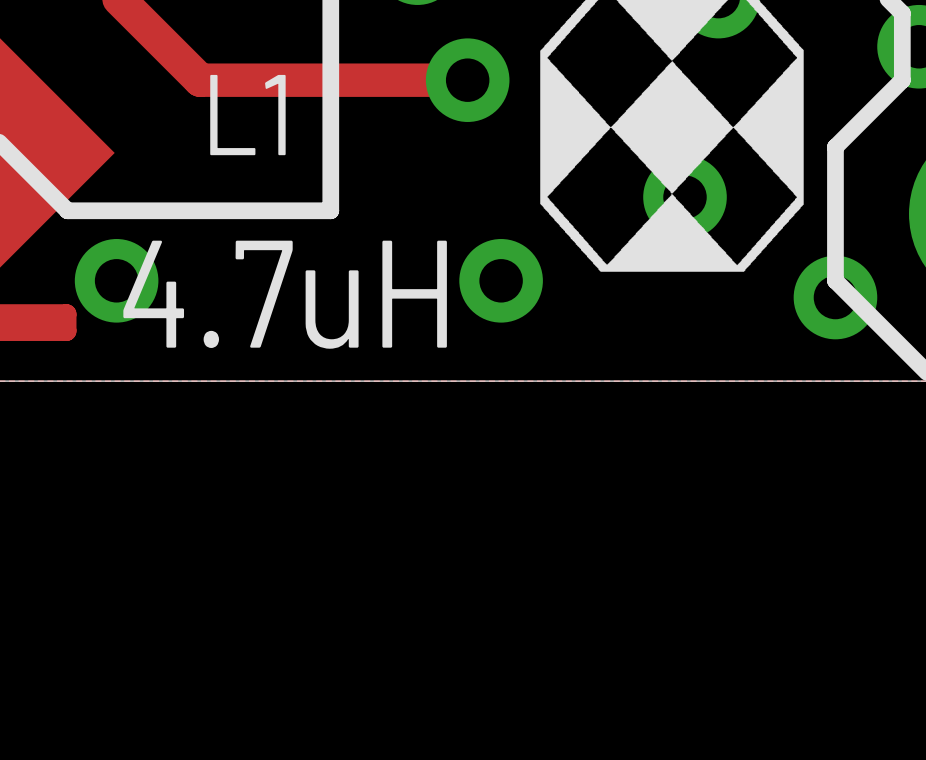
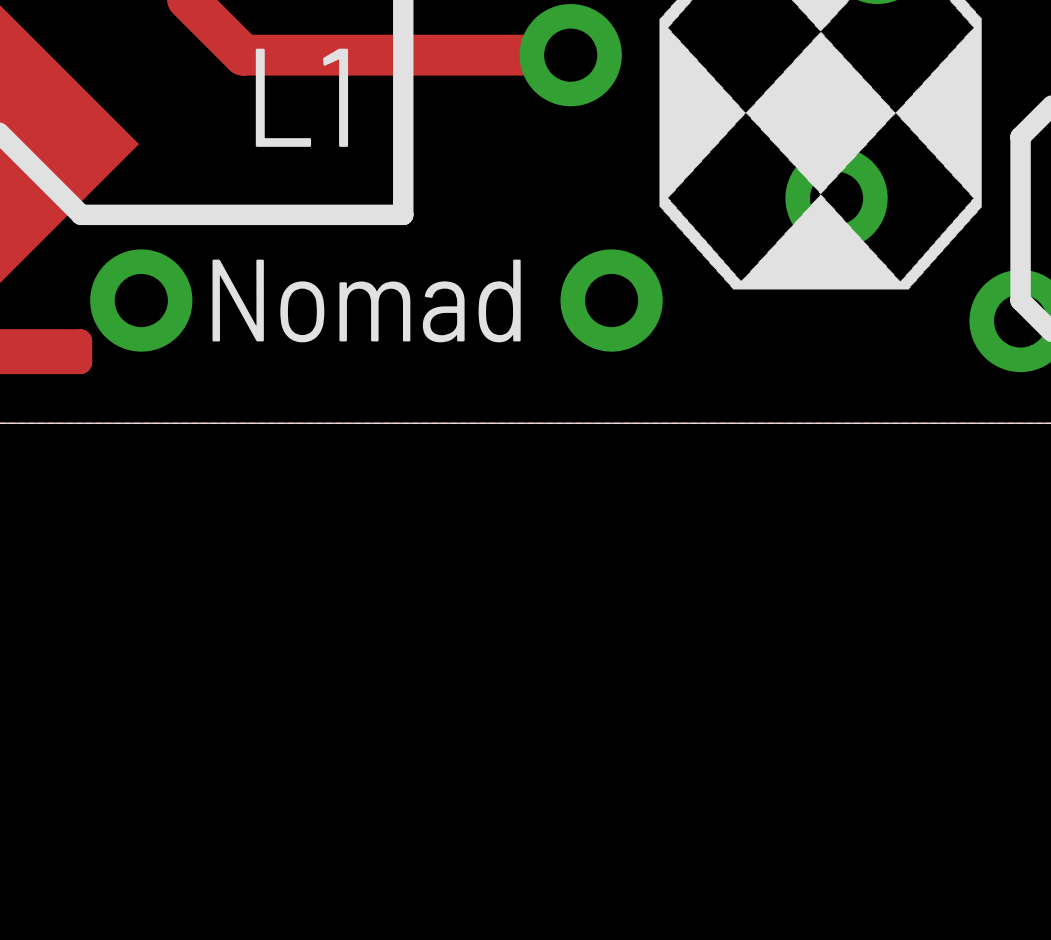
text: 4.7uH (285, 294) -> Nomad (366, 300)

